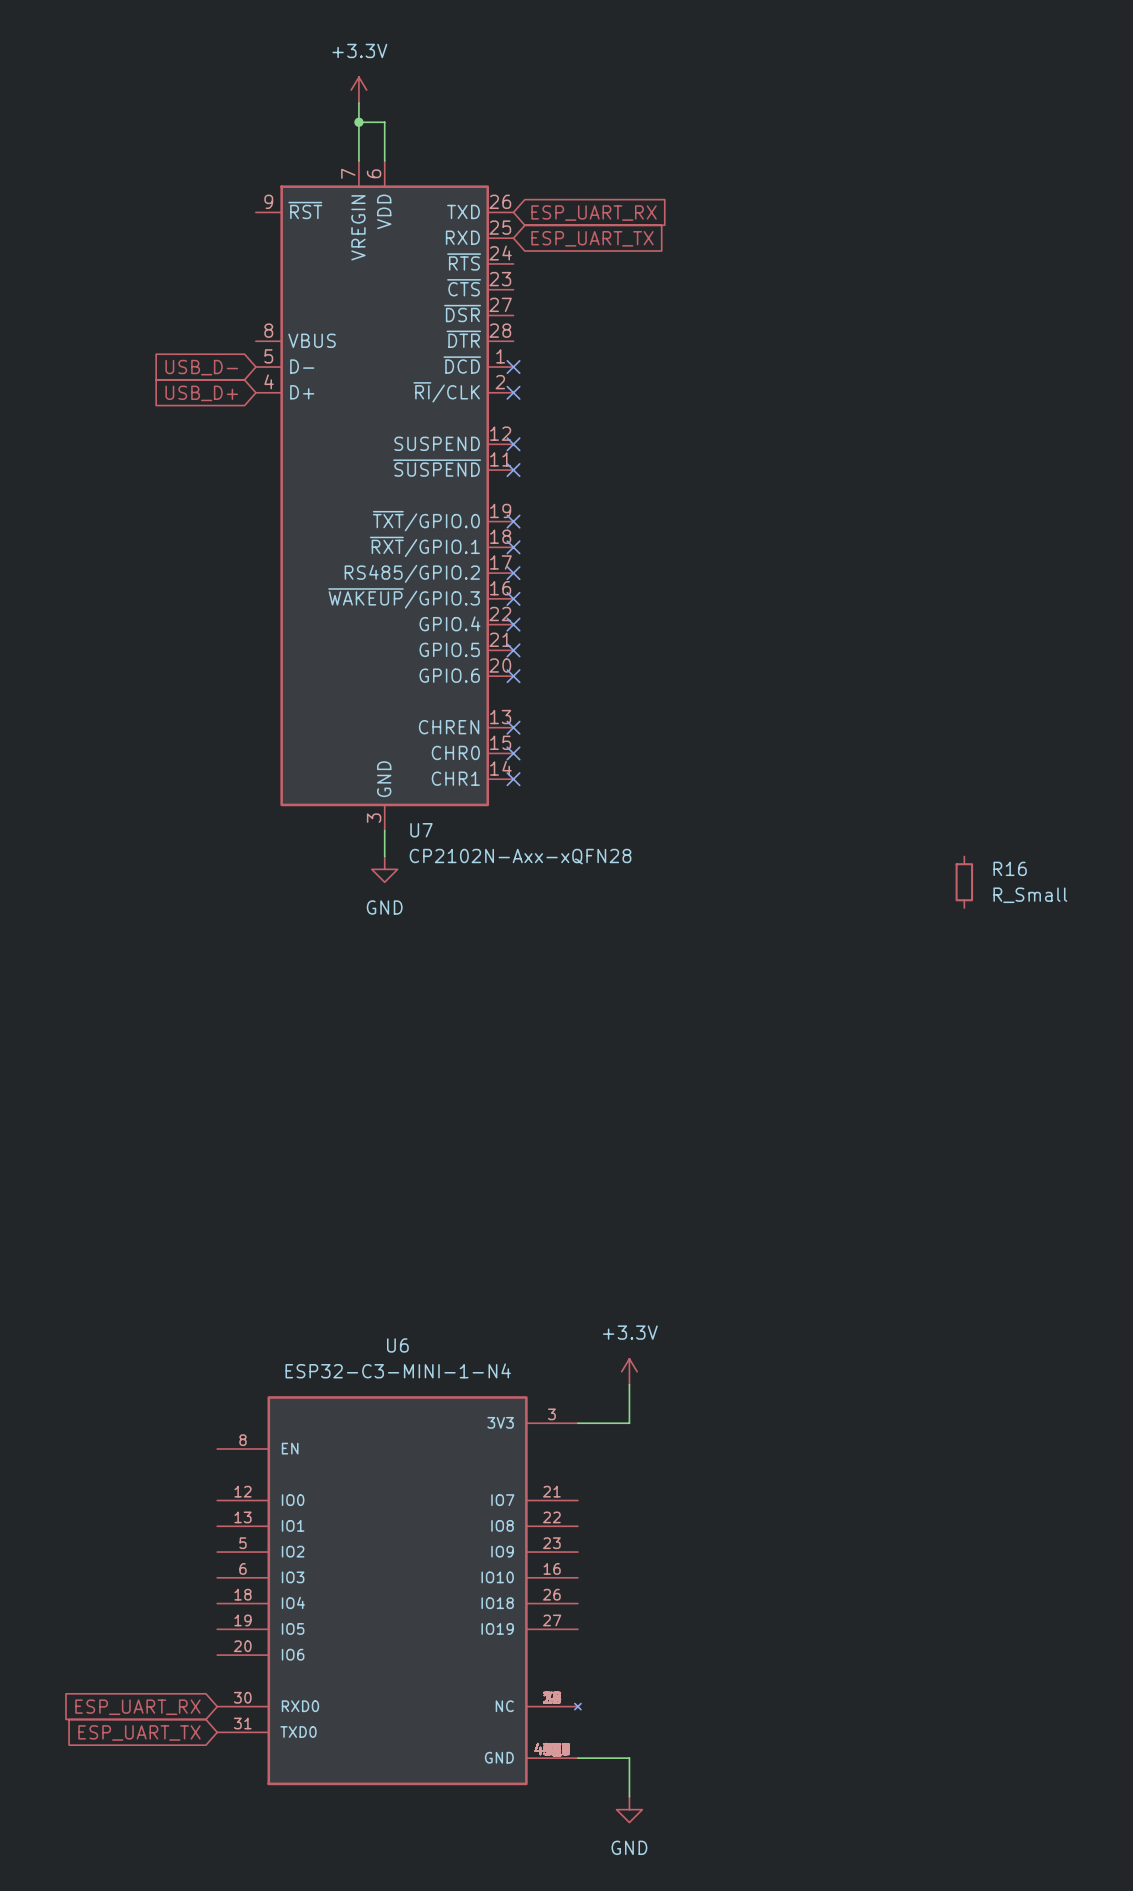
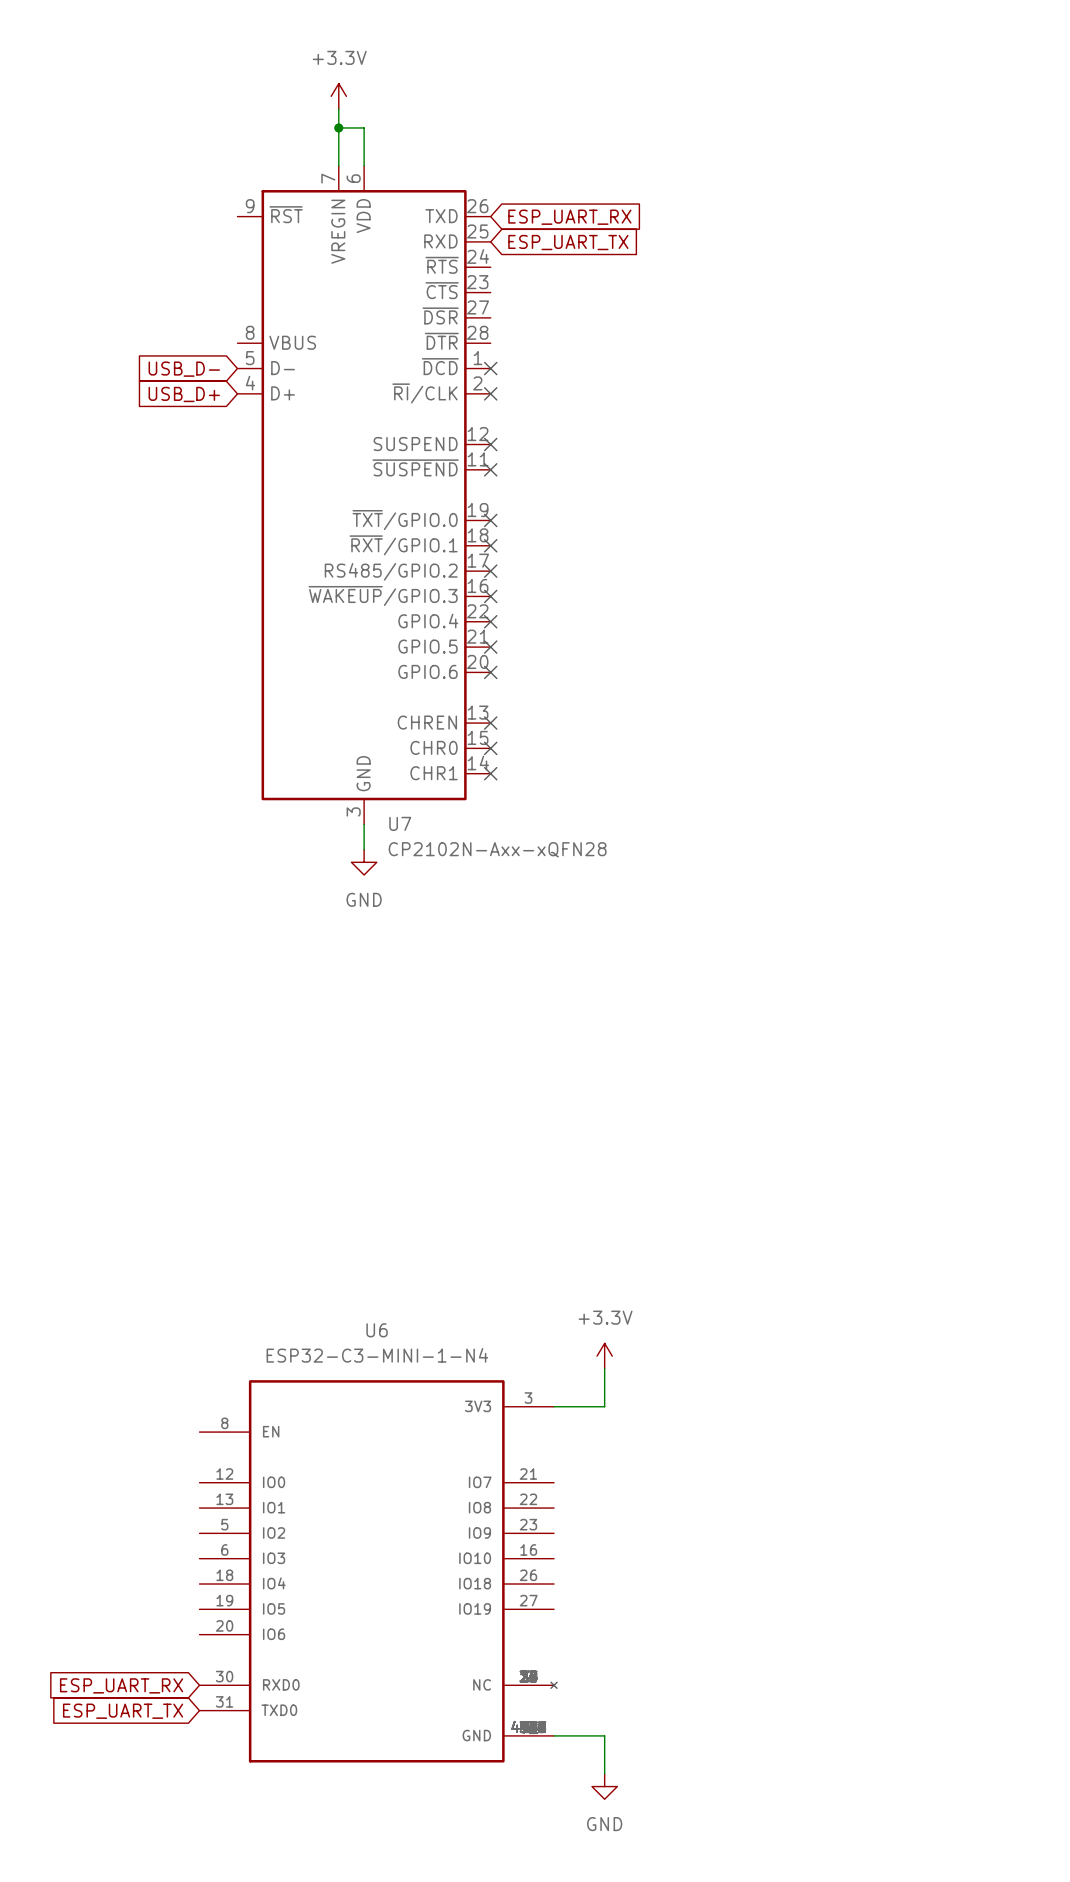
R16: R_Small (964, 882) -> none

